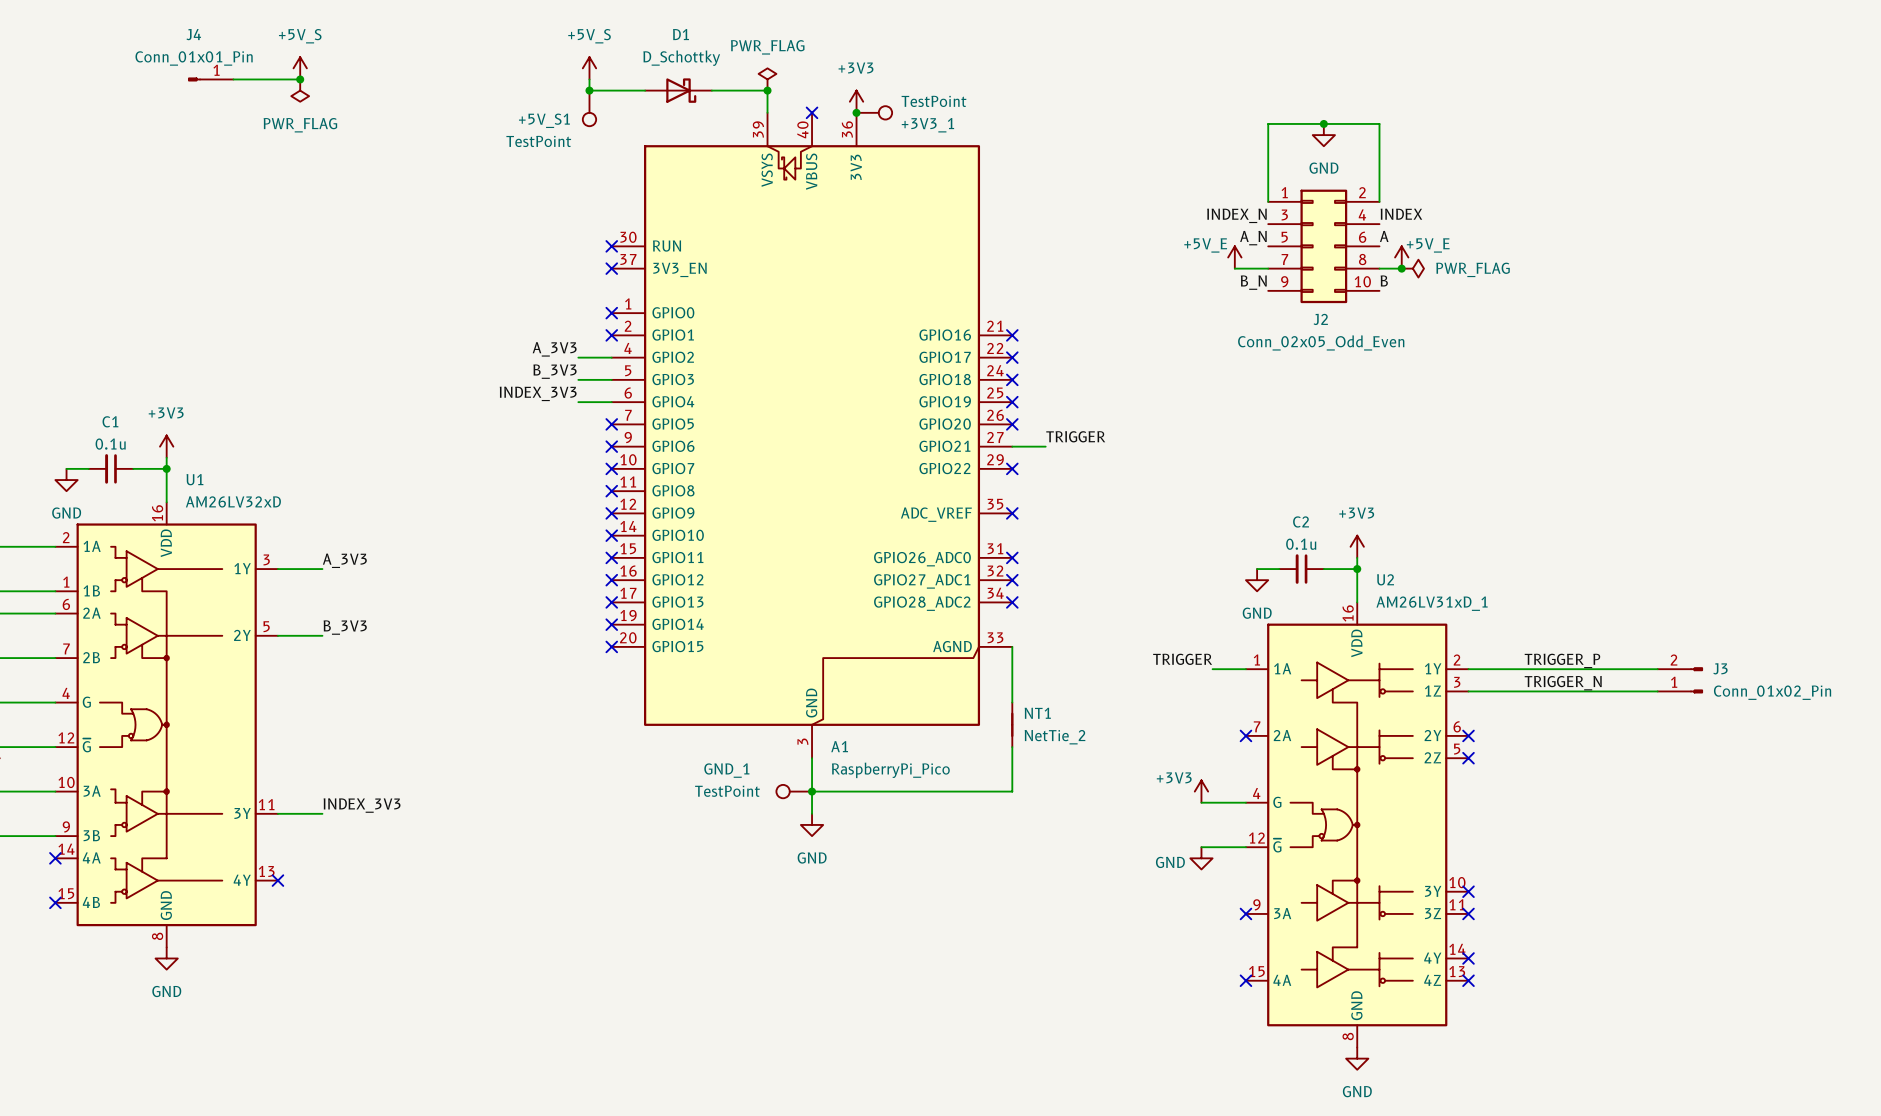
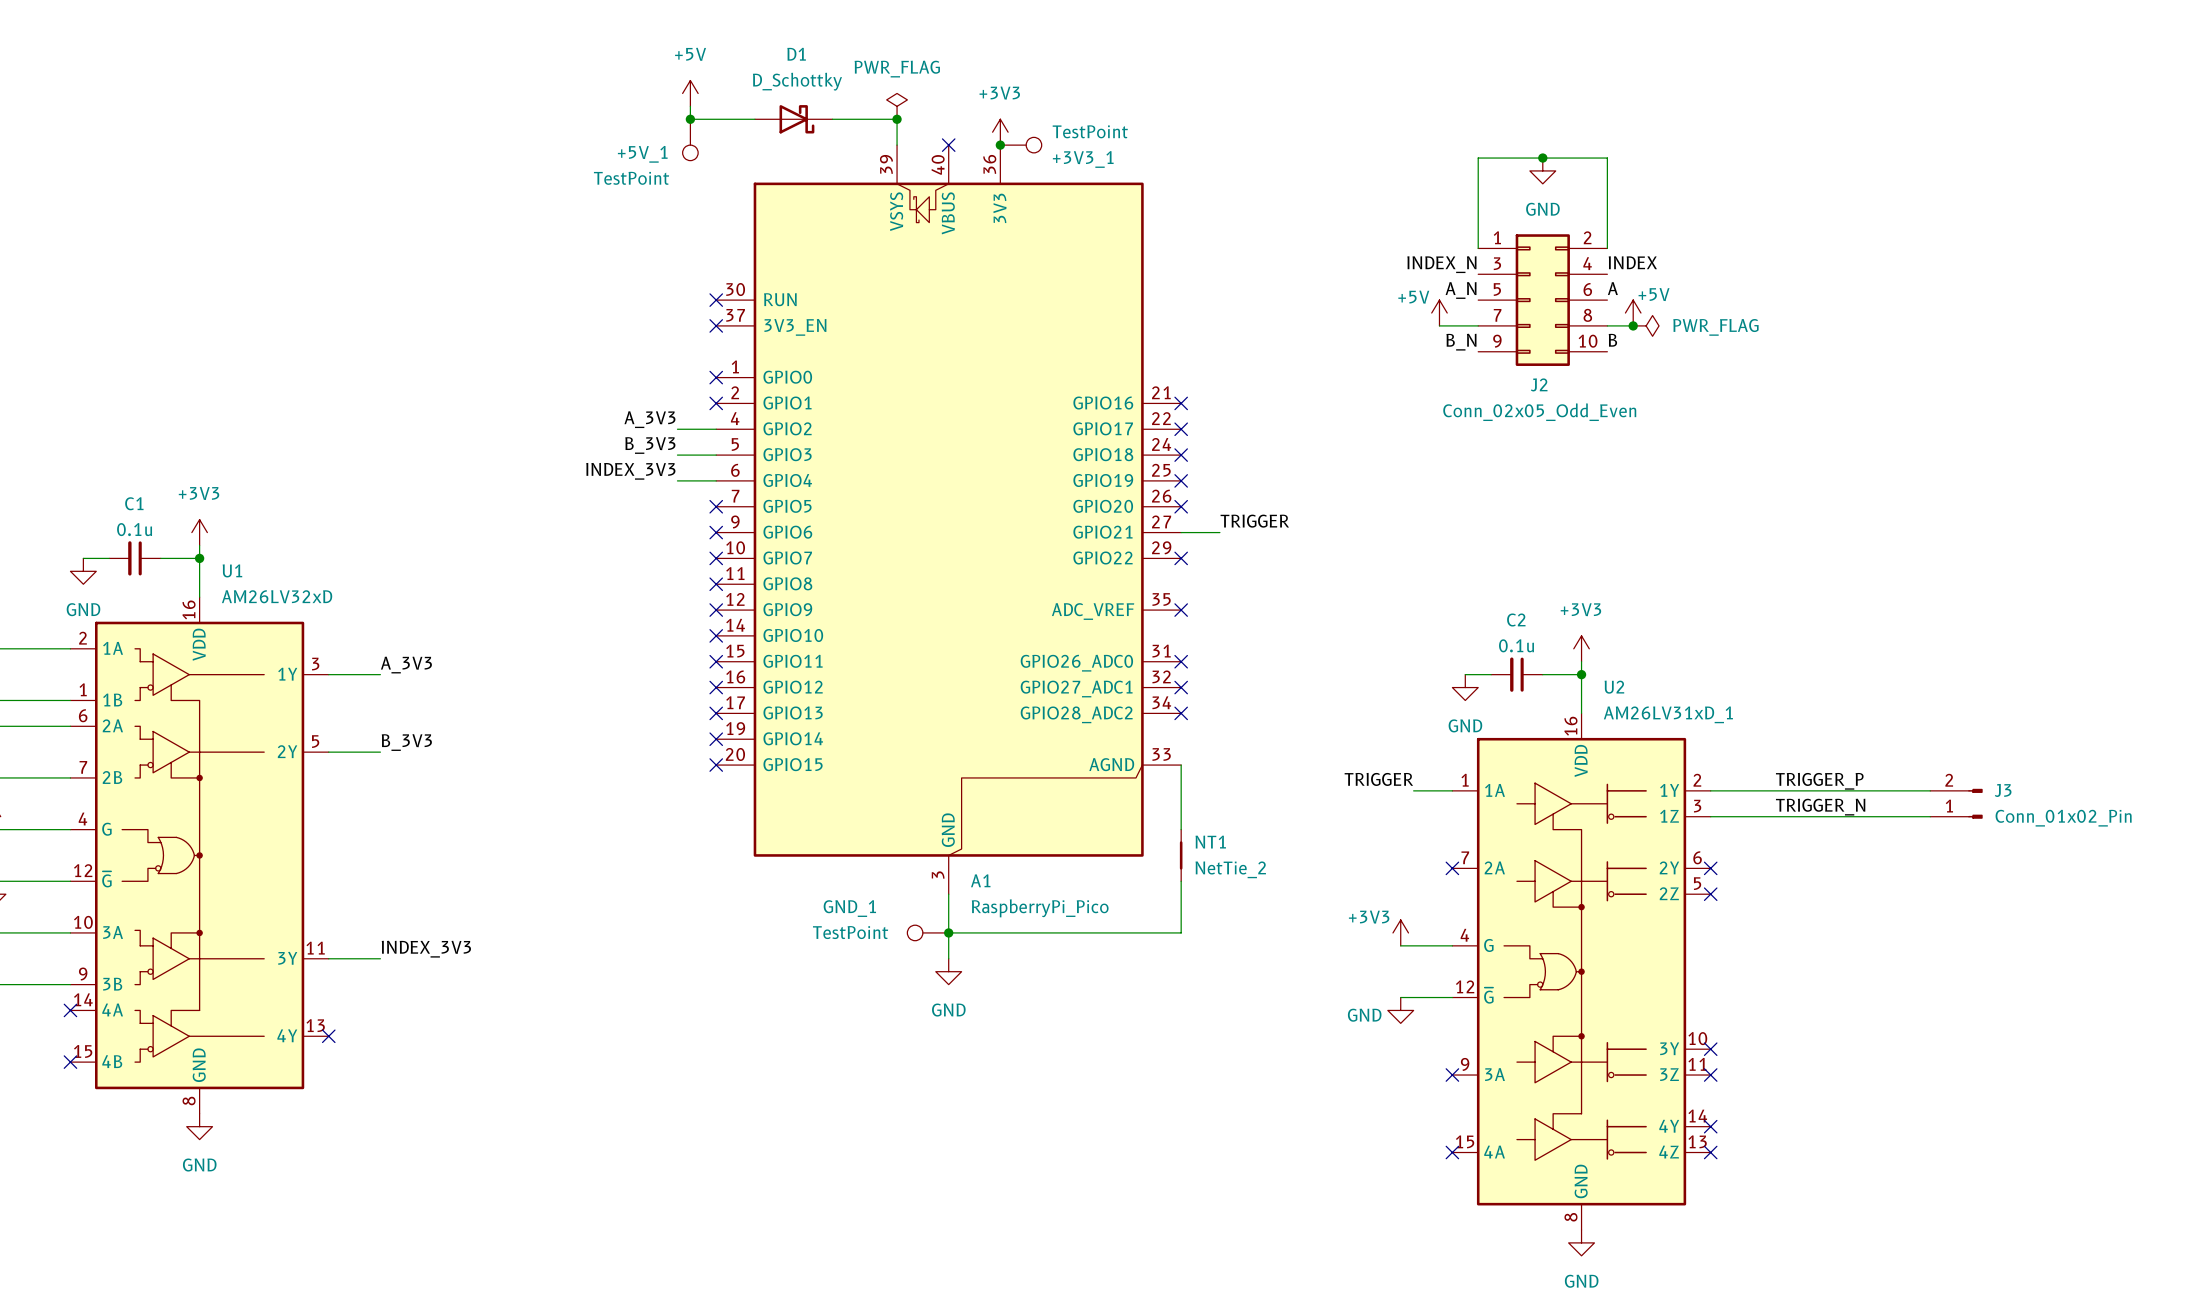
power symbol: +5V_S (300, 68) -> none
power symbol: +5V_S (589, 68) -> +5V (690, 93)
J4: Conn_01x01_Pin (210, 79) -> none
wire: (233, 79) (300, 79) -> none
junction: (300, 79) -> none
power symbol: PWR_FLAG (300, 90) -> none
+5V_S1 name: +5V_S1 (544, 120) -> +5V_1 (642, 154)
power symbol: +5V_E (1234, 257) -> +5V (1439, 313)
power symbol: +5V_E (1401, 257) -> +5V (1633, 313)

